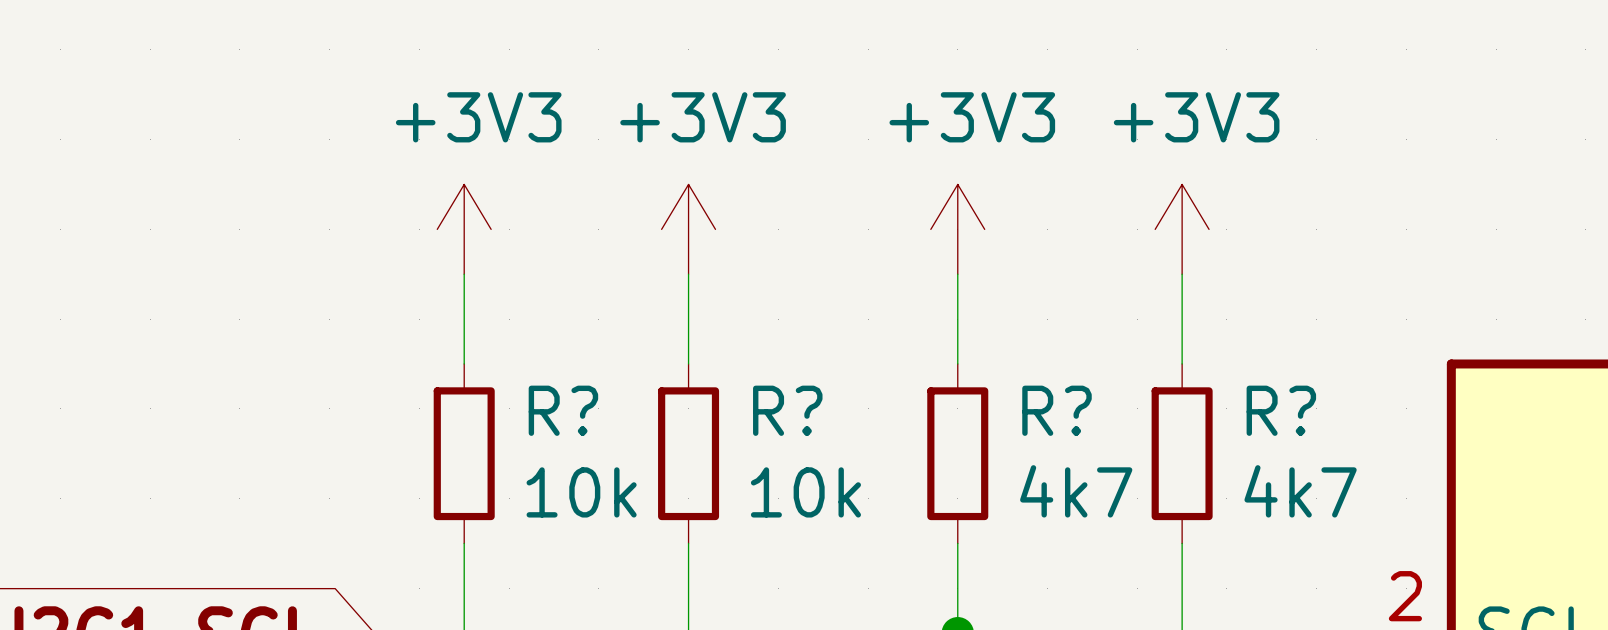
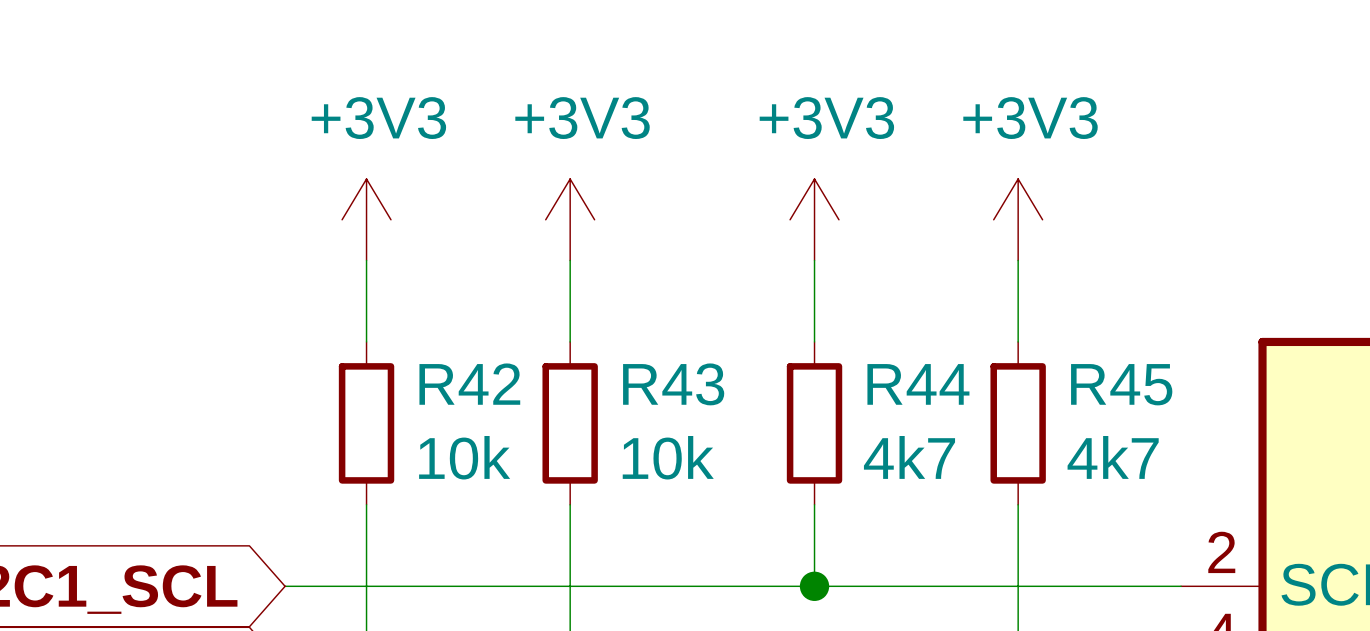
R? name: R? (563, 410) -> R42 (469, 384)
R? name: R? (787, 410) -> R43 (673, 384)
R? name: R? (1056, 410) -> R44 (918, 384)
R? name: R? (1281, 410) -> R45 (1121, 384)

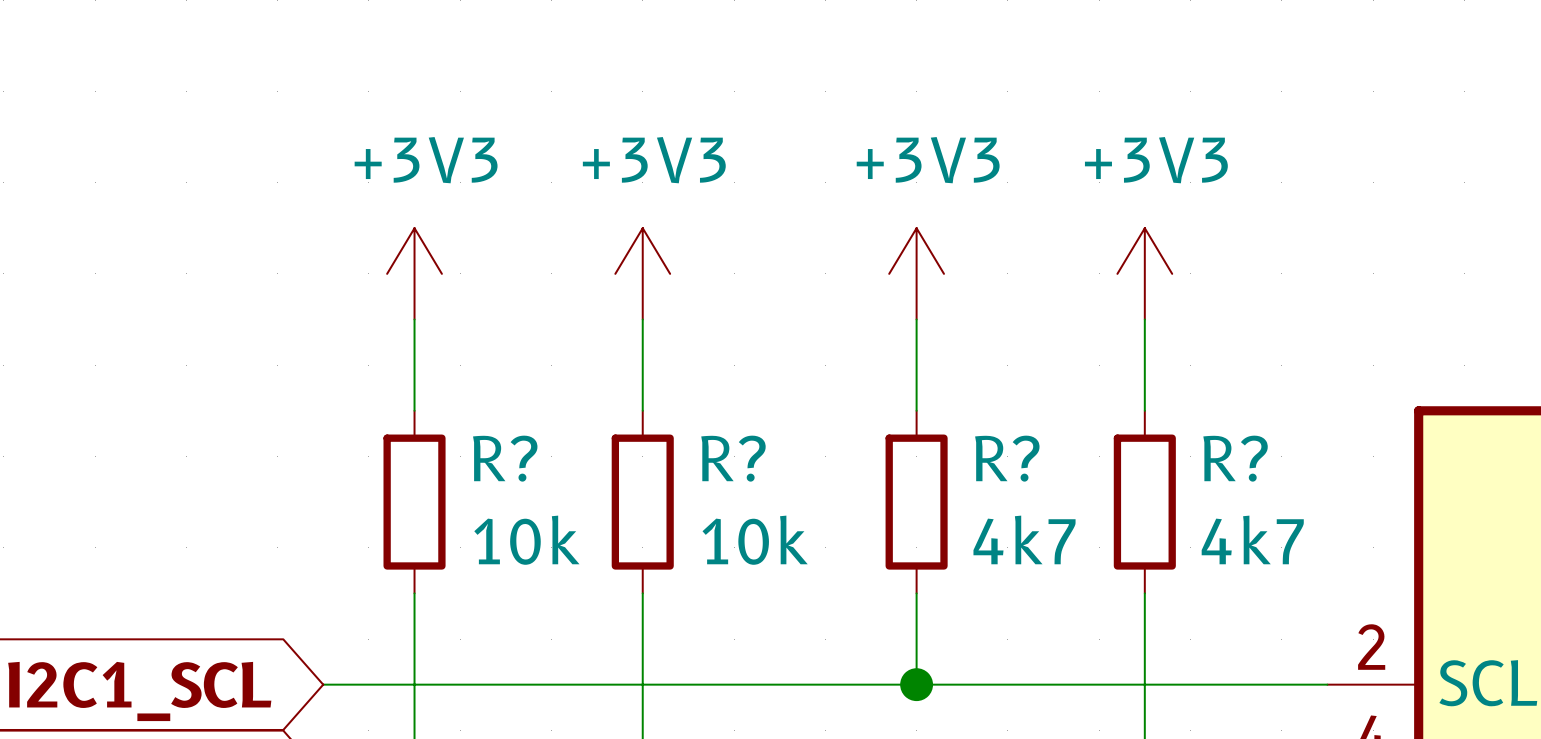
R42 name: R42 (469, 384) -> R? (505, 458)
R43 name: R43 (673, 384) -> R? (733, 458)
R44 name: R44 (918, 384) -> R? (1007, 458)
R45 name: R45 (1121, 384) -> R? (1235, 458)

